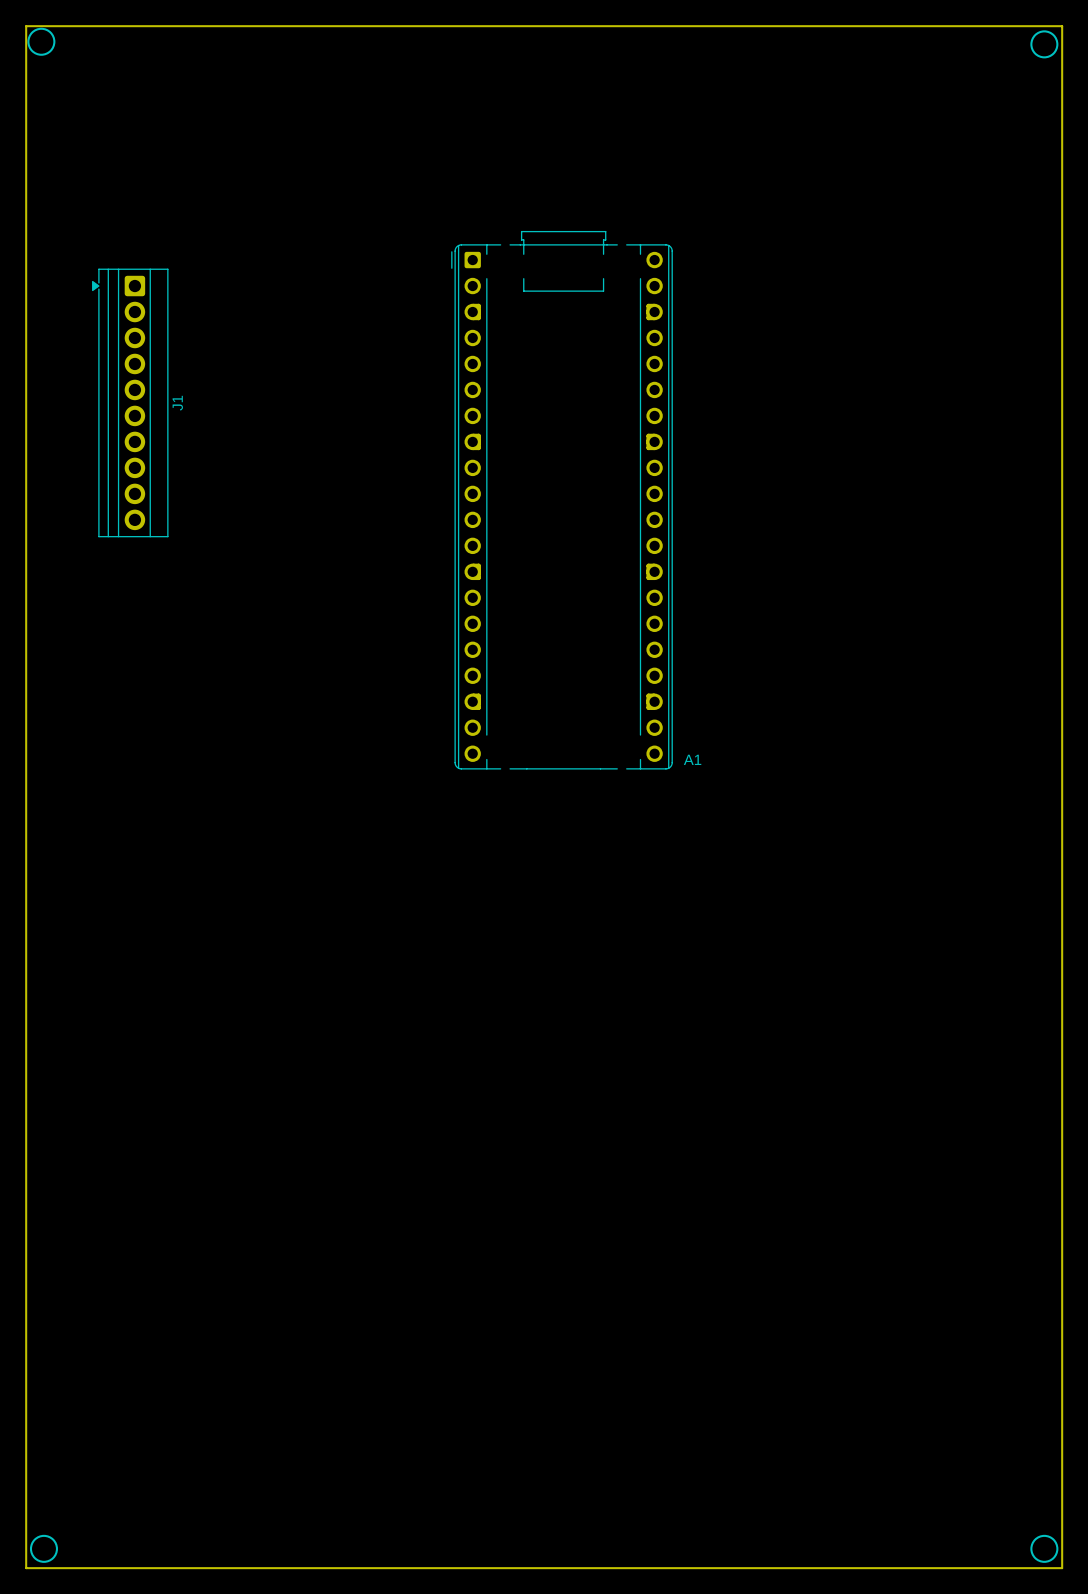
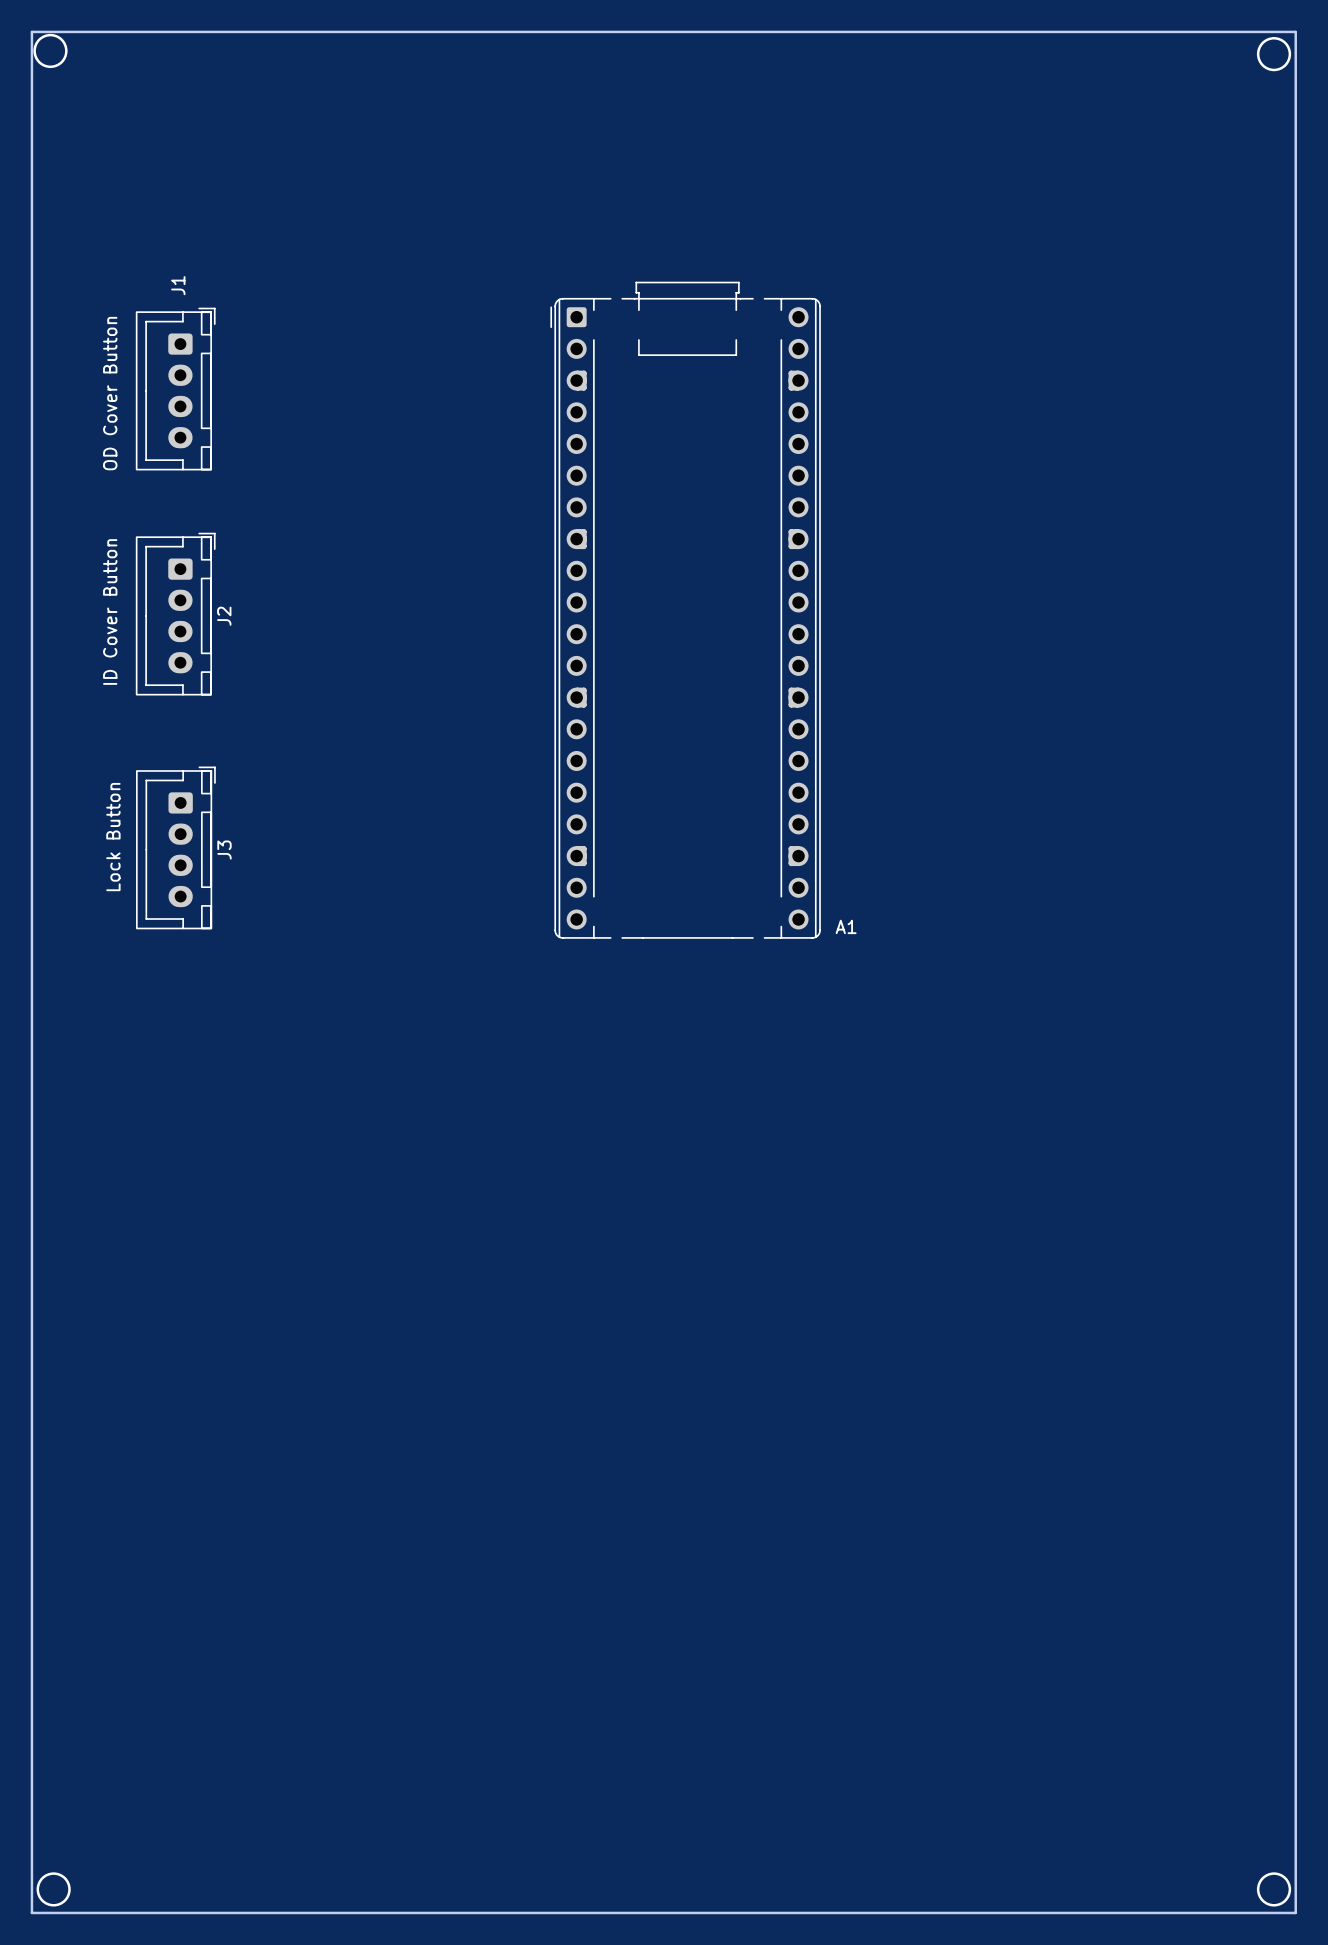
J1 footprint: [92, 268, 169, 538] -> [135, 307, 216, 471]
J1 text: none -> OD Cover Button (110, 393)
J1 name position: J1 (177, 403) -> J1 (178, 285)
J2: none -> (175, 614)
J3: none -> (175, 847)

